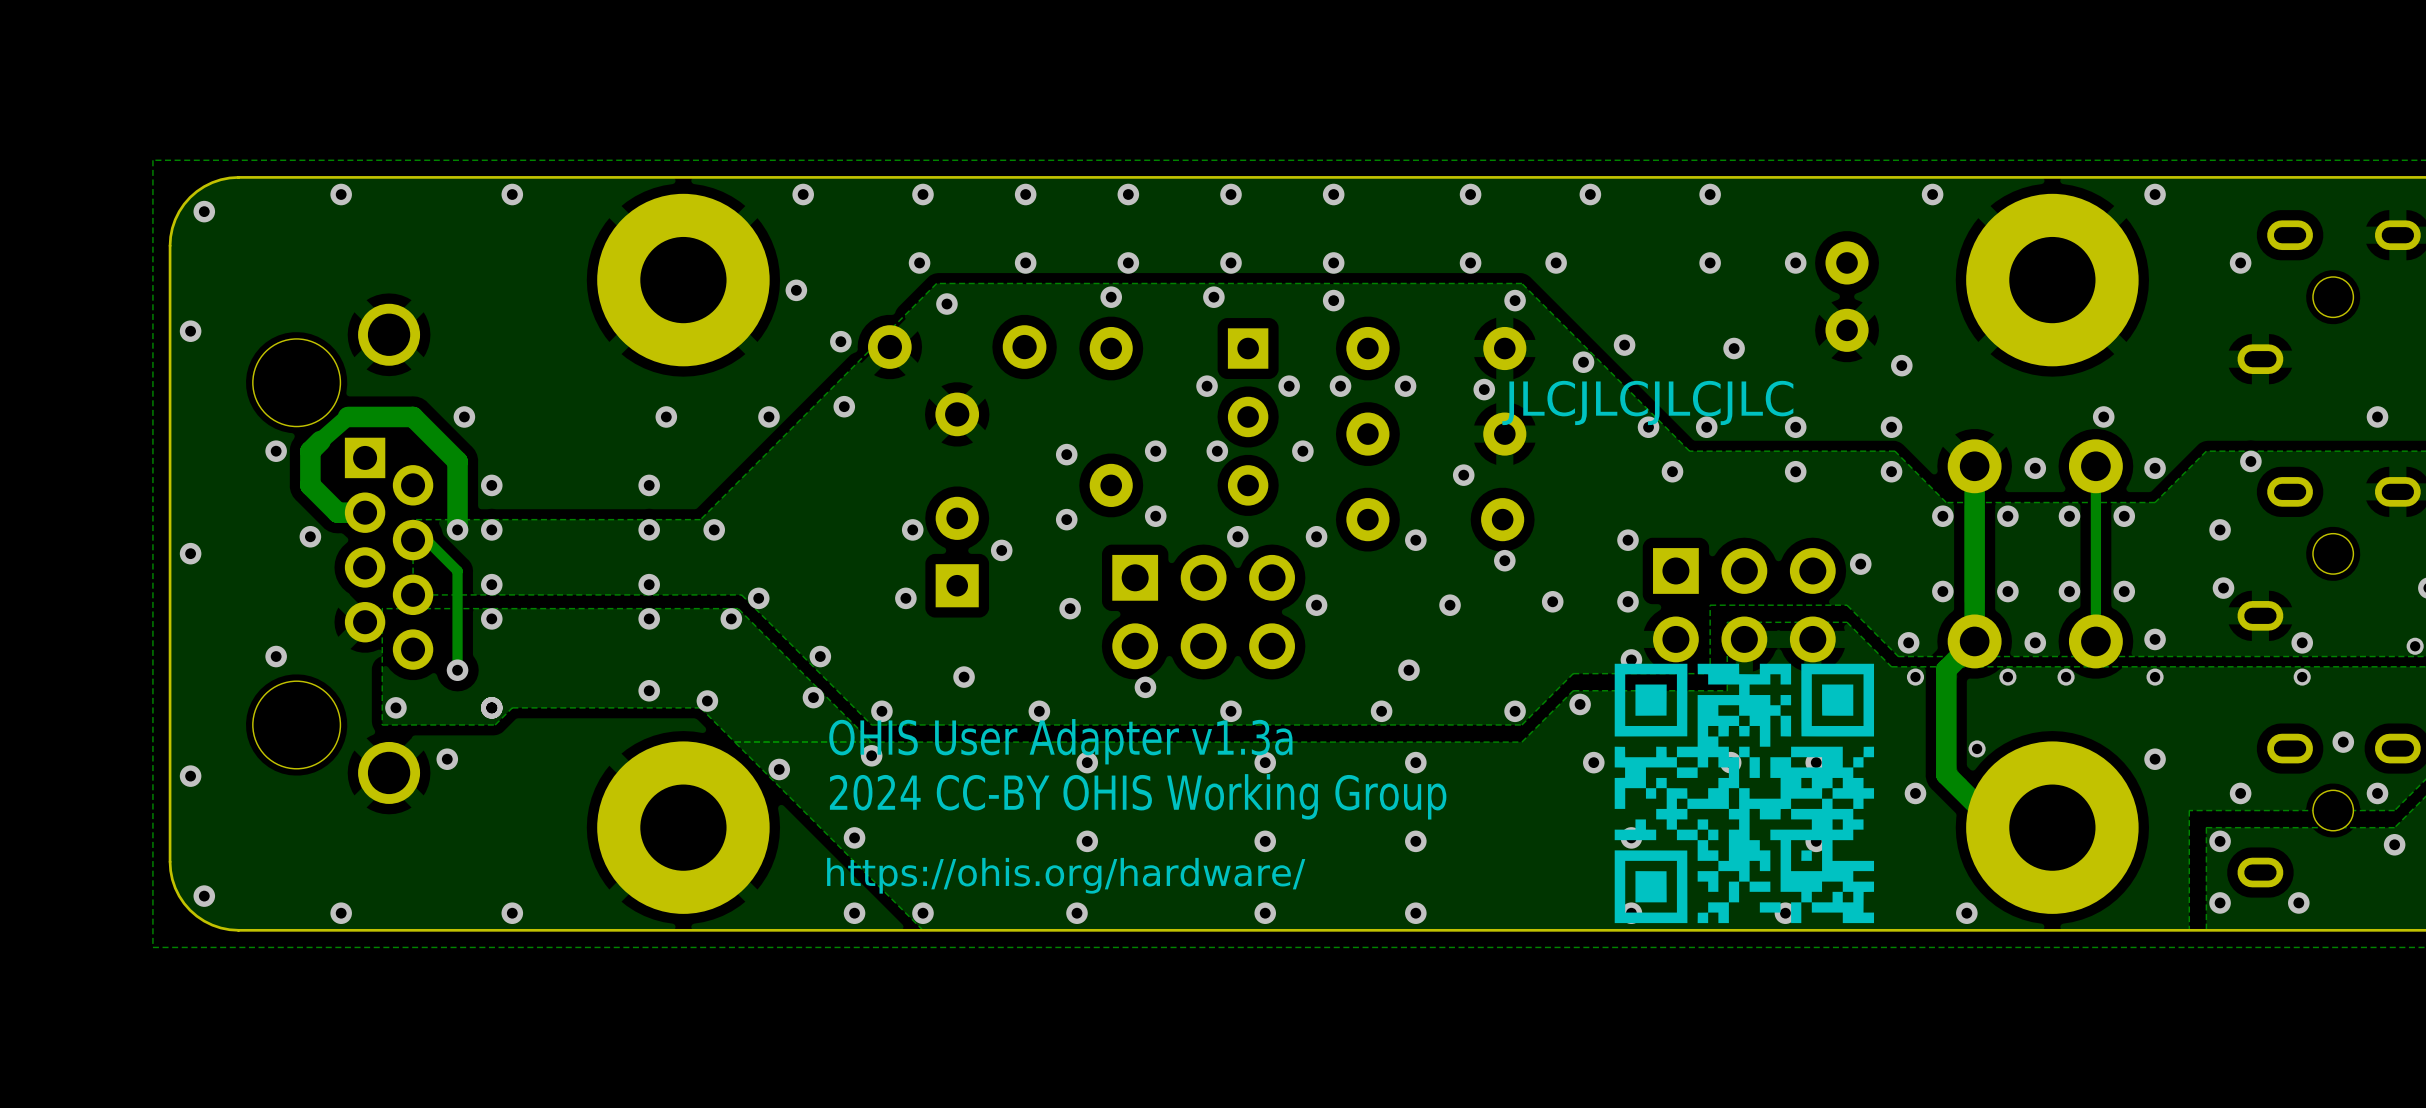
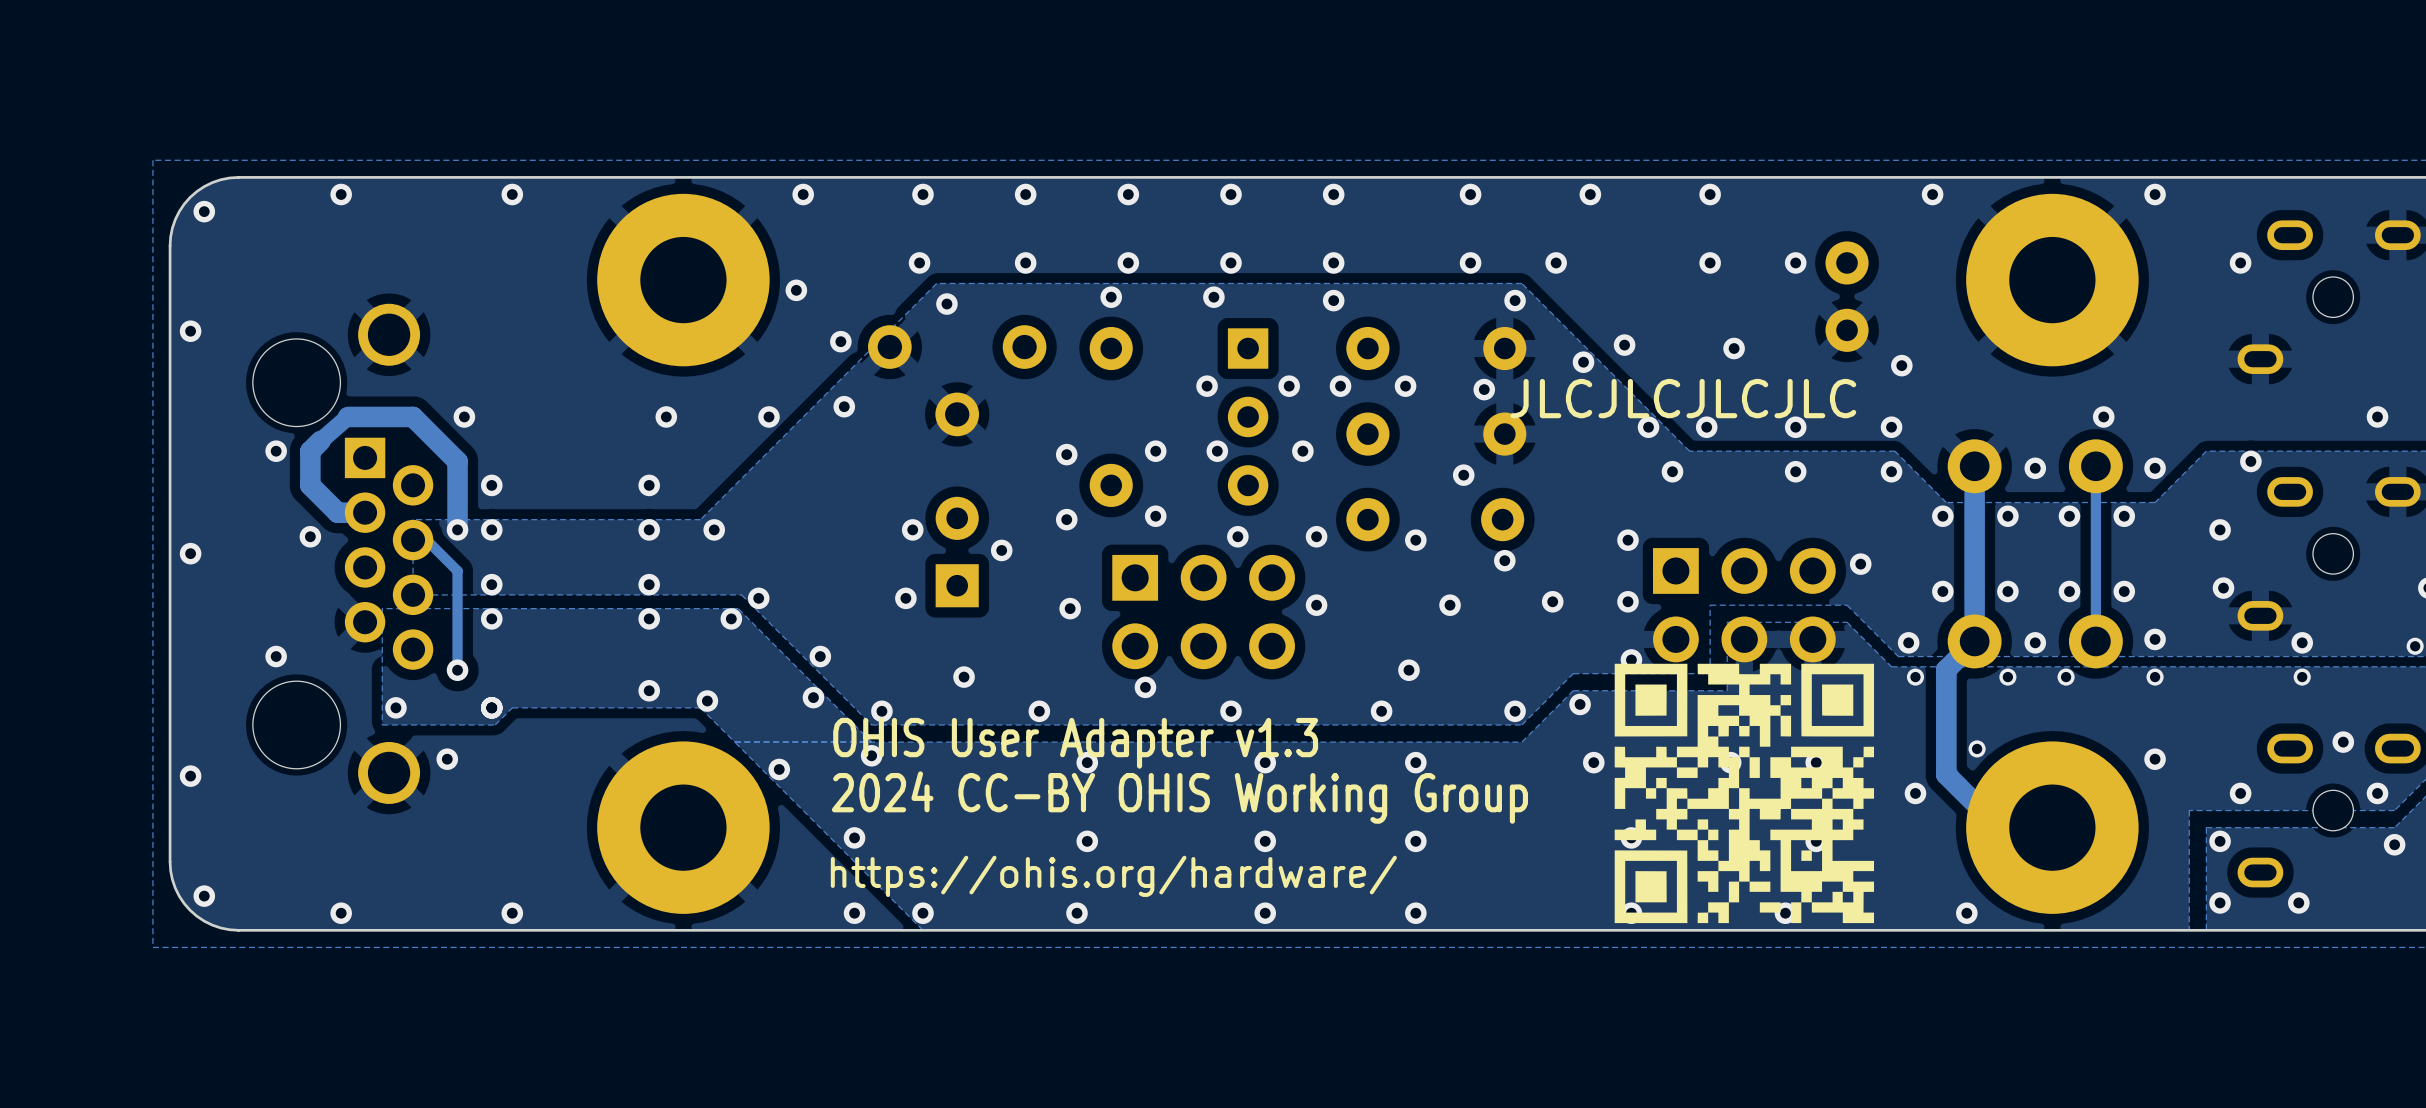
text: OHIS User Adapter v1.3a (1060, 741) -> OHIS User Adapter v1.3 (1075, 743)

